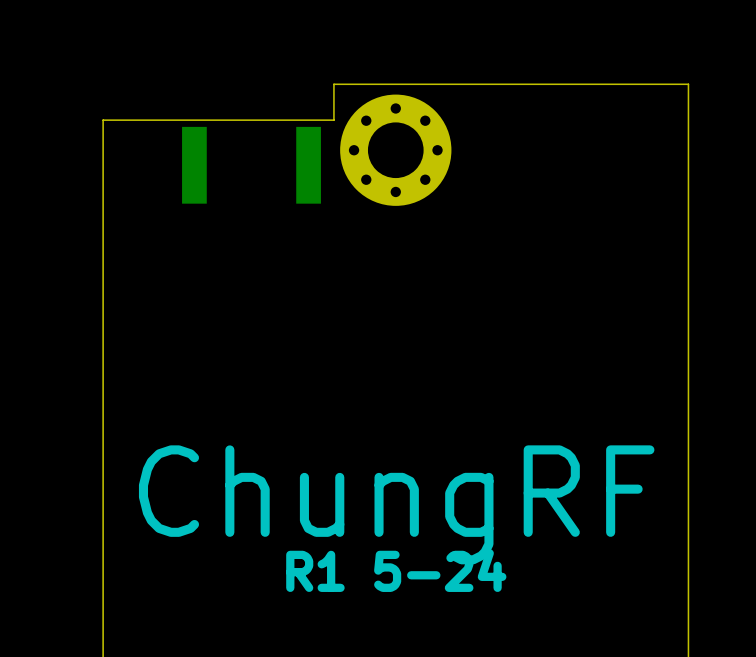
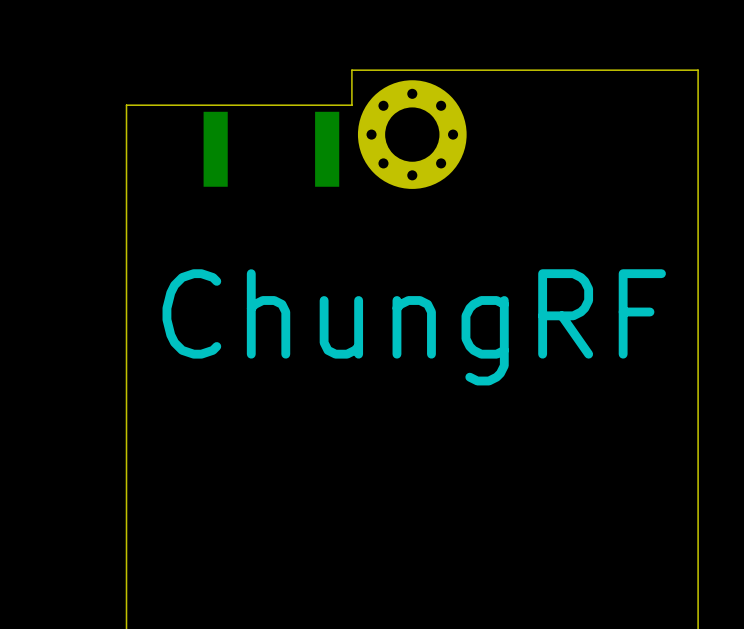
text position: ChungRF (396, 504) -> ChungRF (414, 327)
text: R1 5-24 (396, 570) -> none

